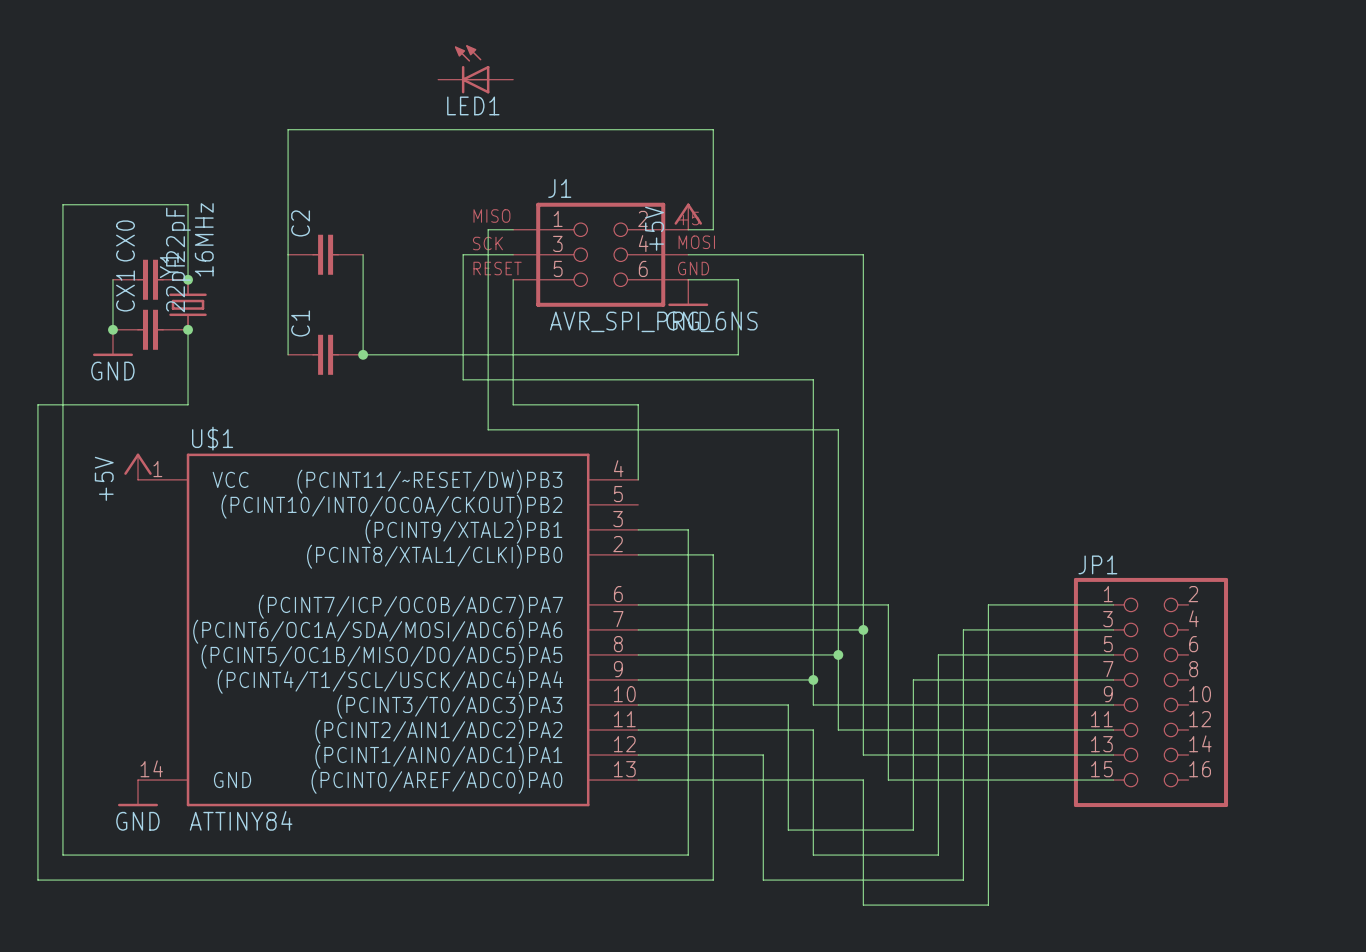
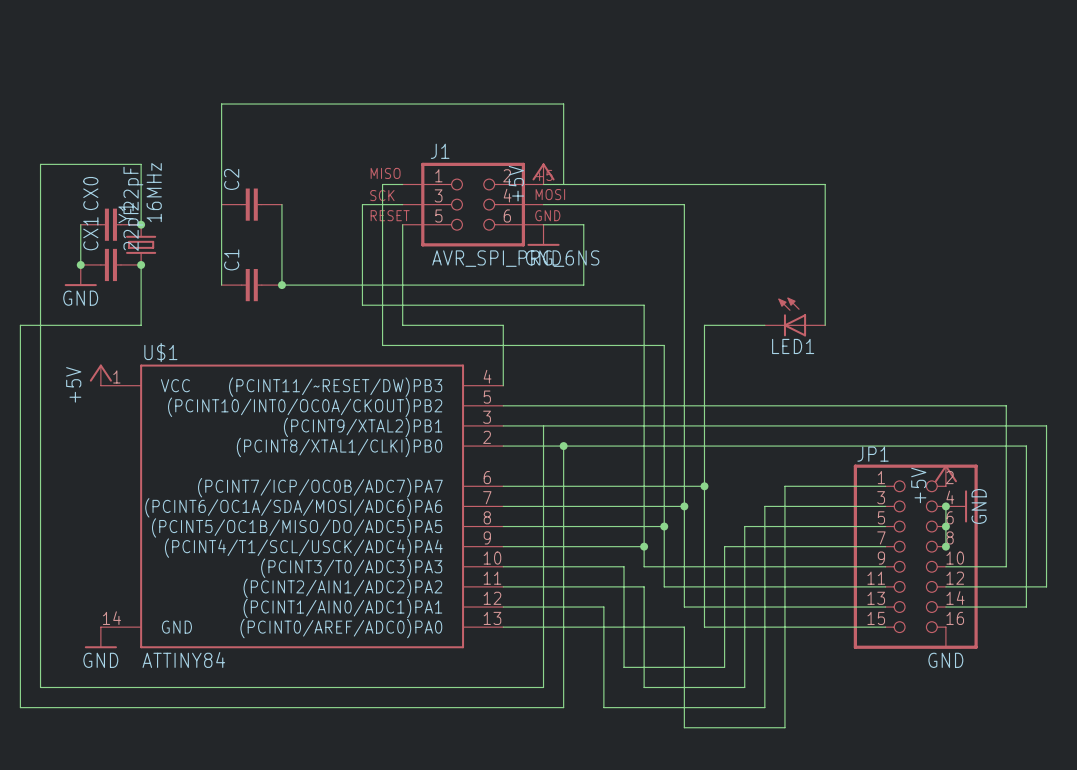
LED1 position: (475, 69) -> (795, 316)
wire: none -> (563, 184) (825, 184) (825, 325)
wire: none -> (764, 325) (704, 325) (704, 486)
wire: none -> (503, 405) (1006, 405) (1006, 566) (945, 566)
wire: none -> (543, 425) (1046, 425) (1046, 586) (945, 586)
wire: none -> (563, 446) (1026, 446) (1026, 607) (945, 607)
junction: none -> (563, 446)
power symbol: none -> +5V (945, 475)
junction: none -> (704, 486)
wire: none -> (945, 506) (945, 546)
junction: none -> (945, 506)
power symbol: none -> GND (956, 506)
junction: none -> (945, 526)
junction: none -> (945, 546)
power symbol: none -> GND (945, 637)

